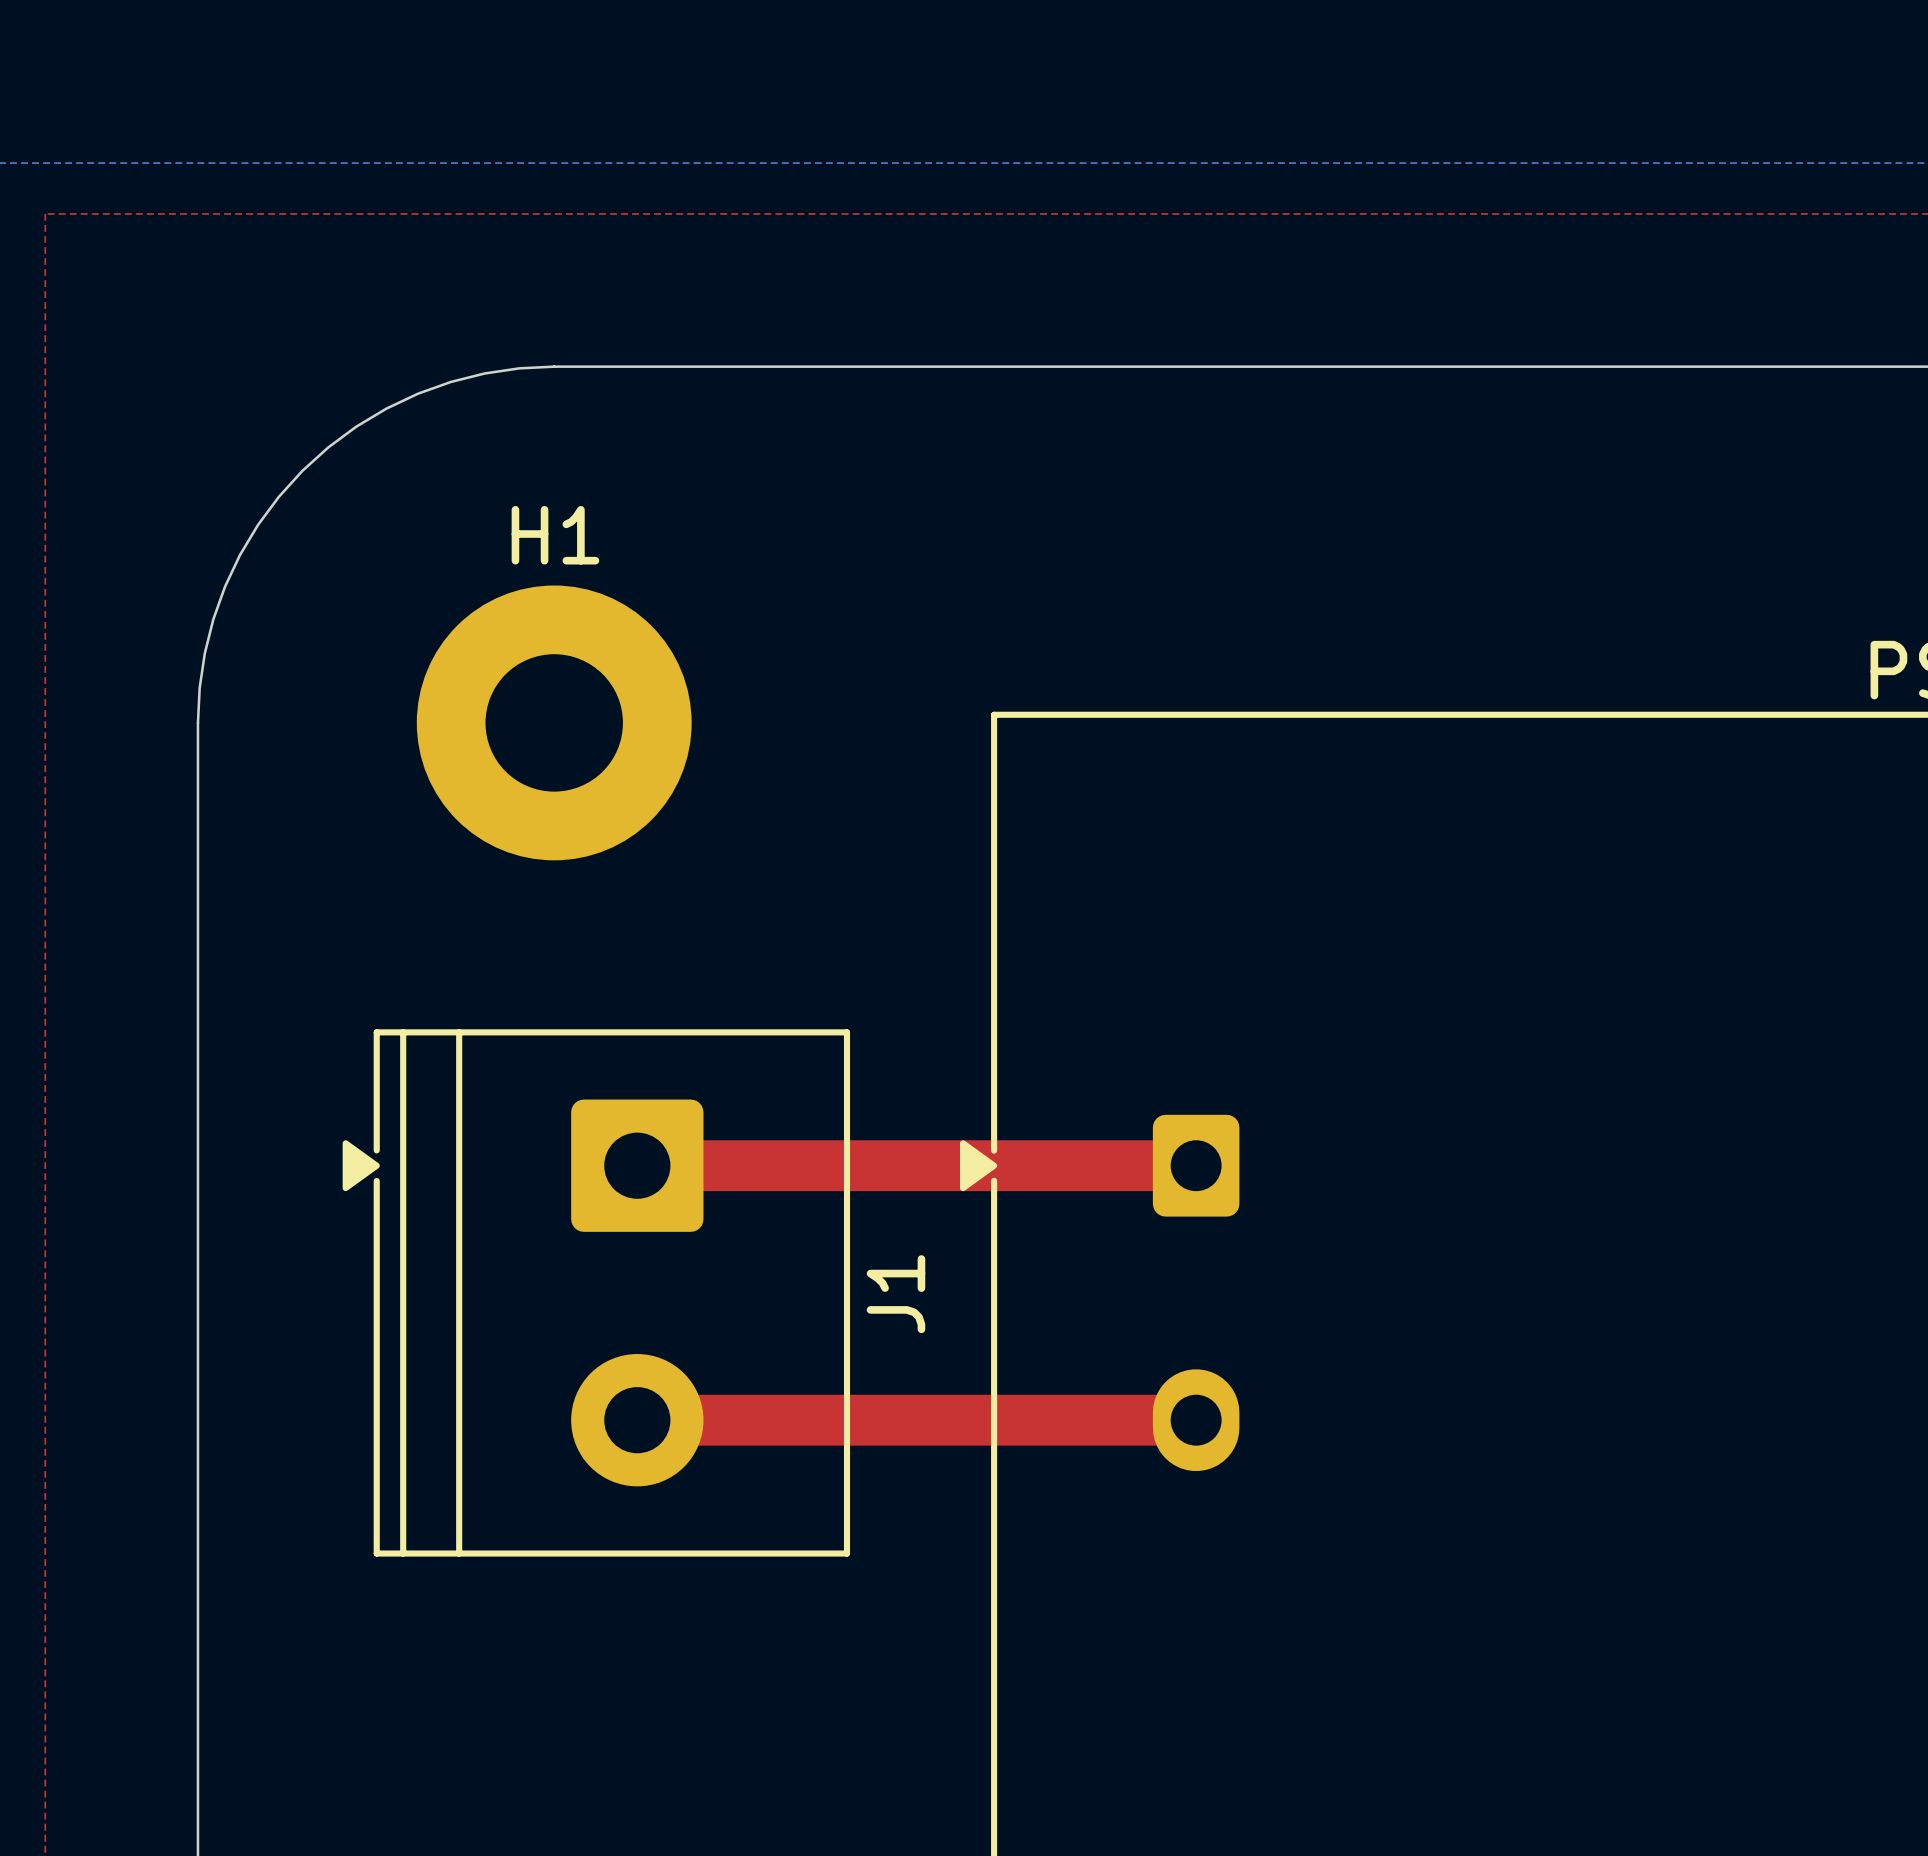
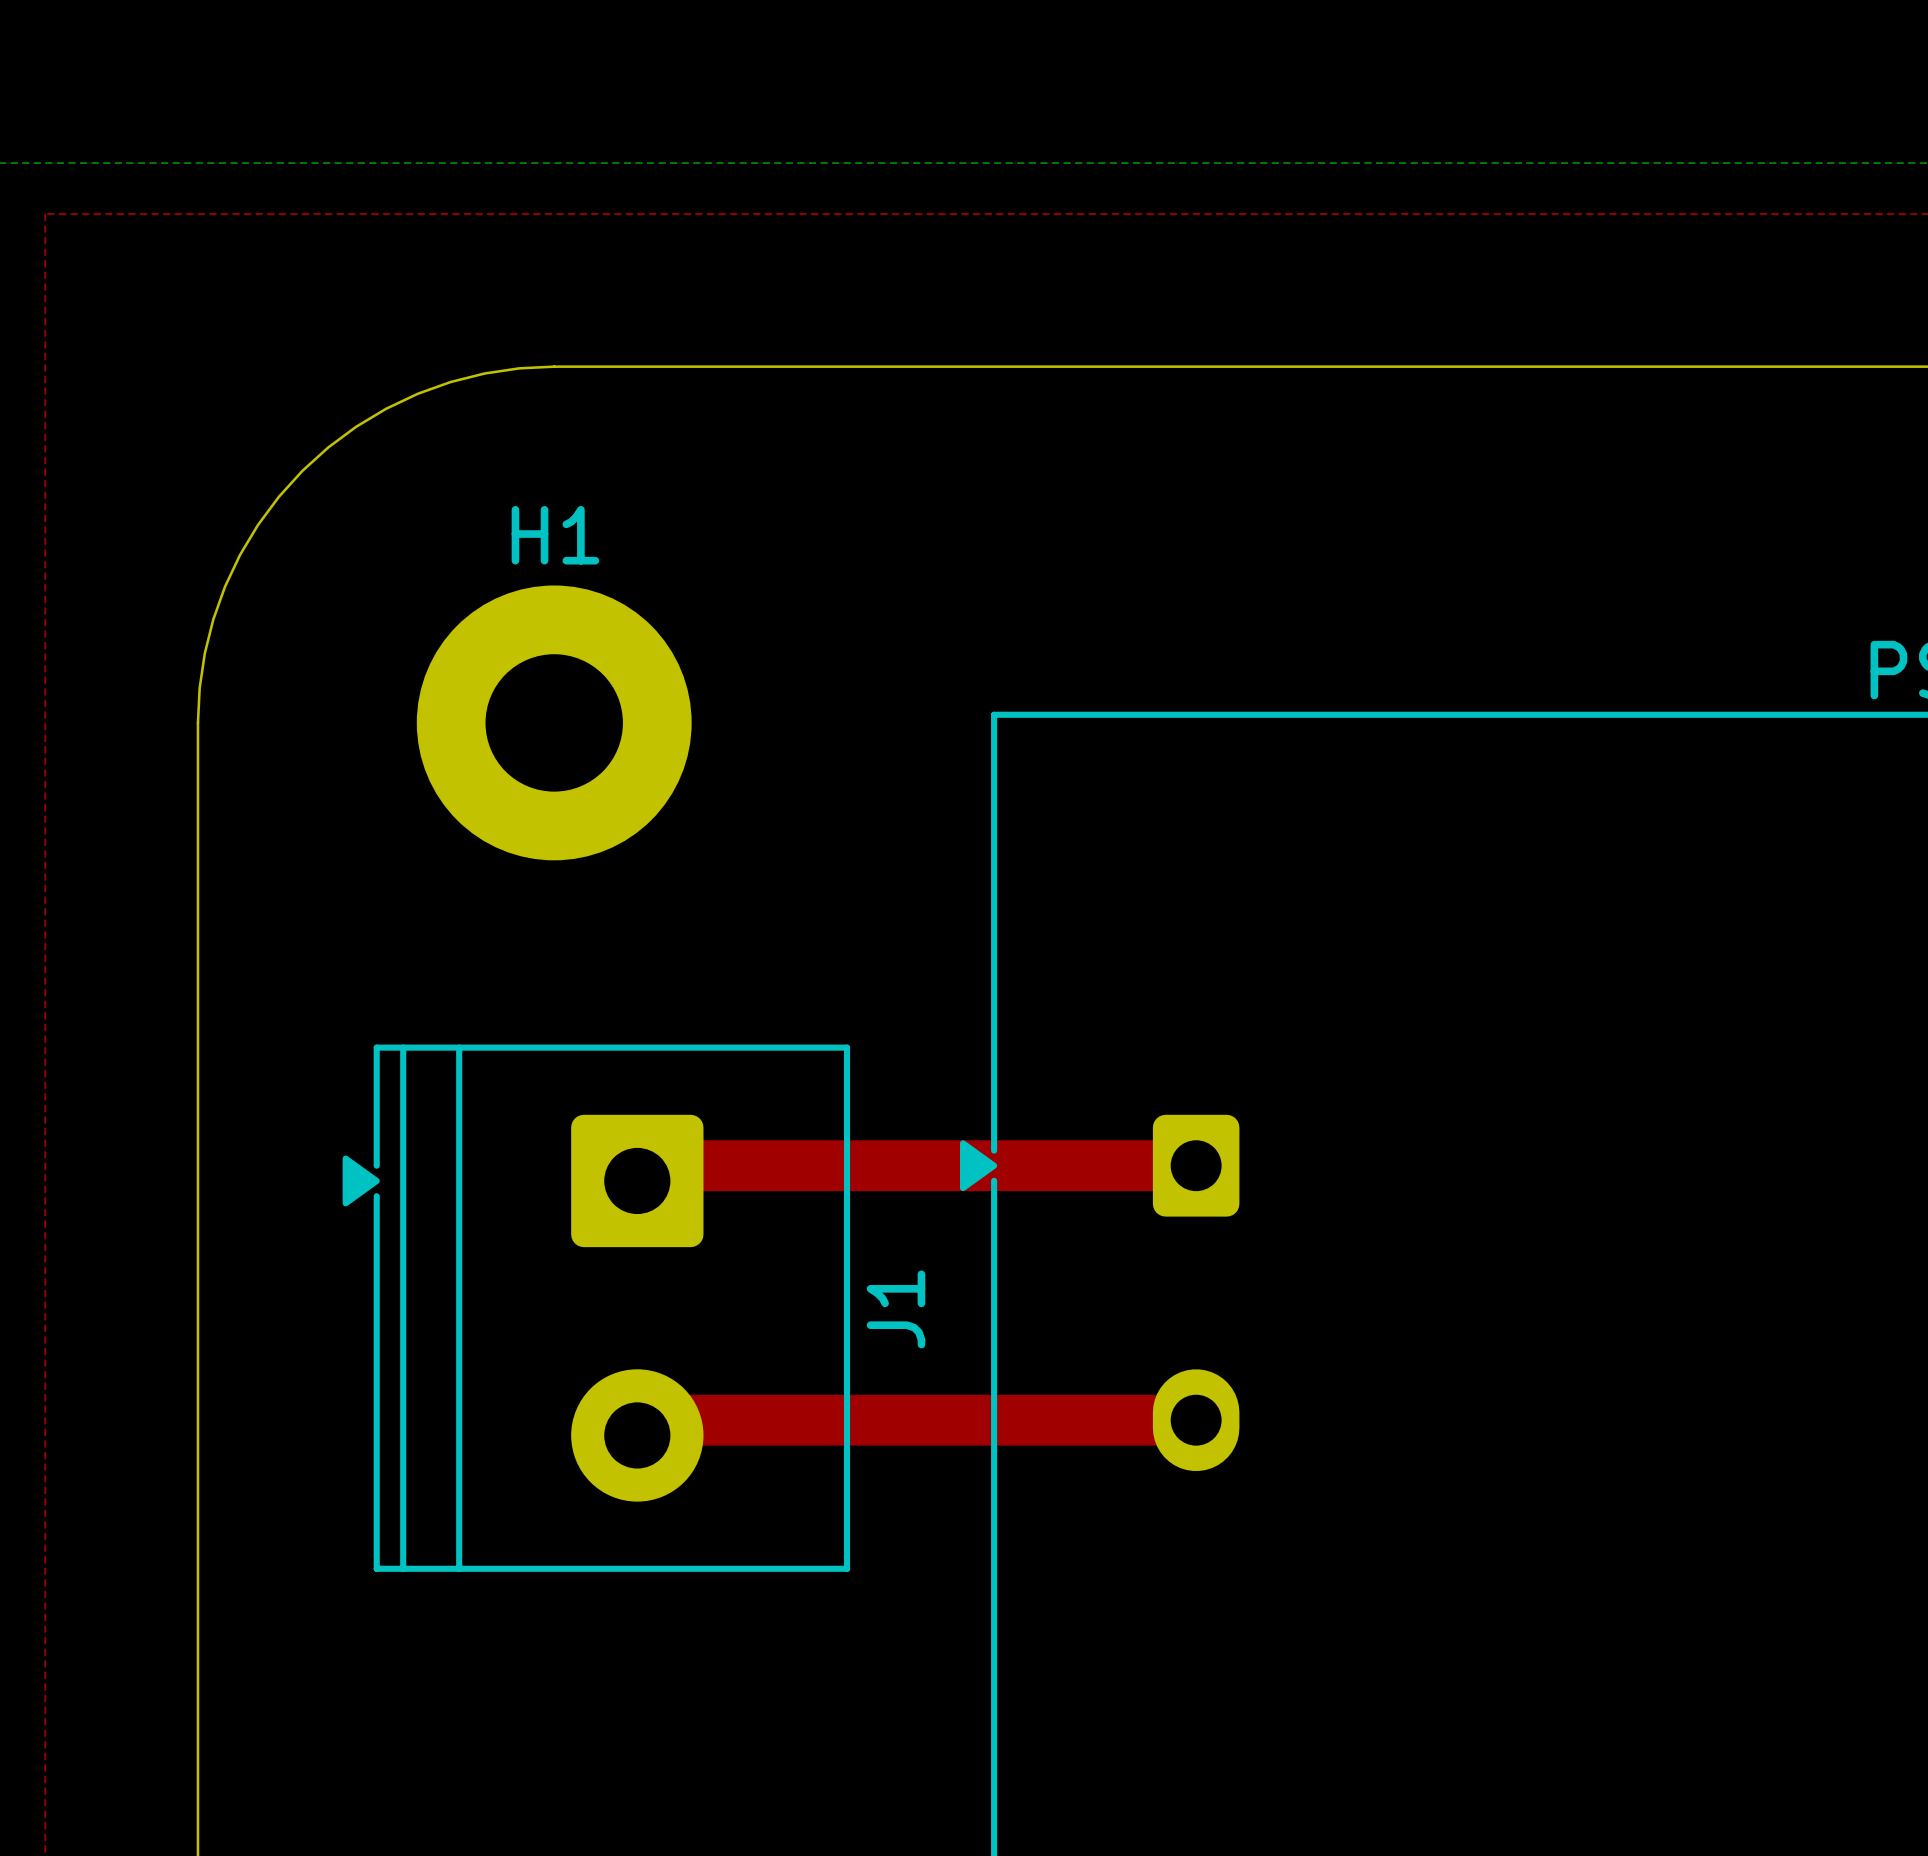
J1 position: (596, 1292) -> (596, 1308)

